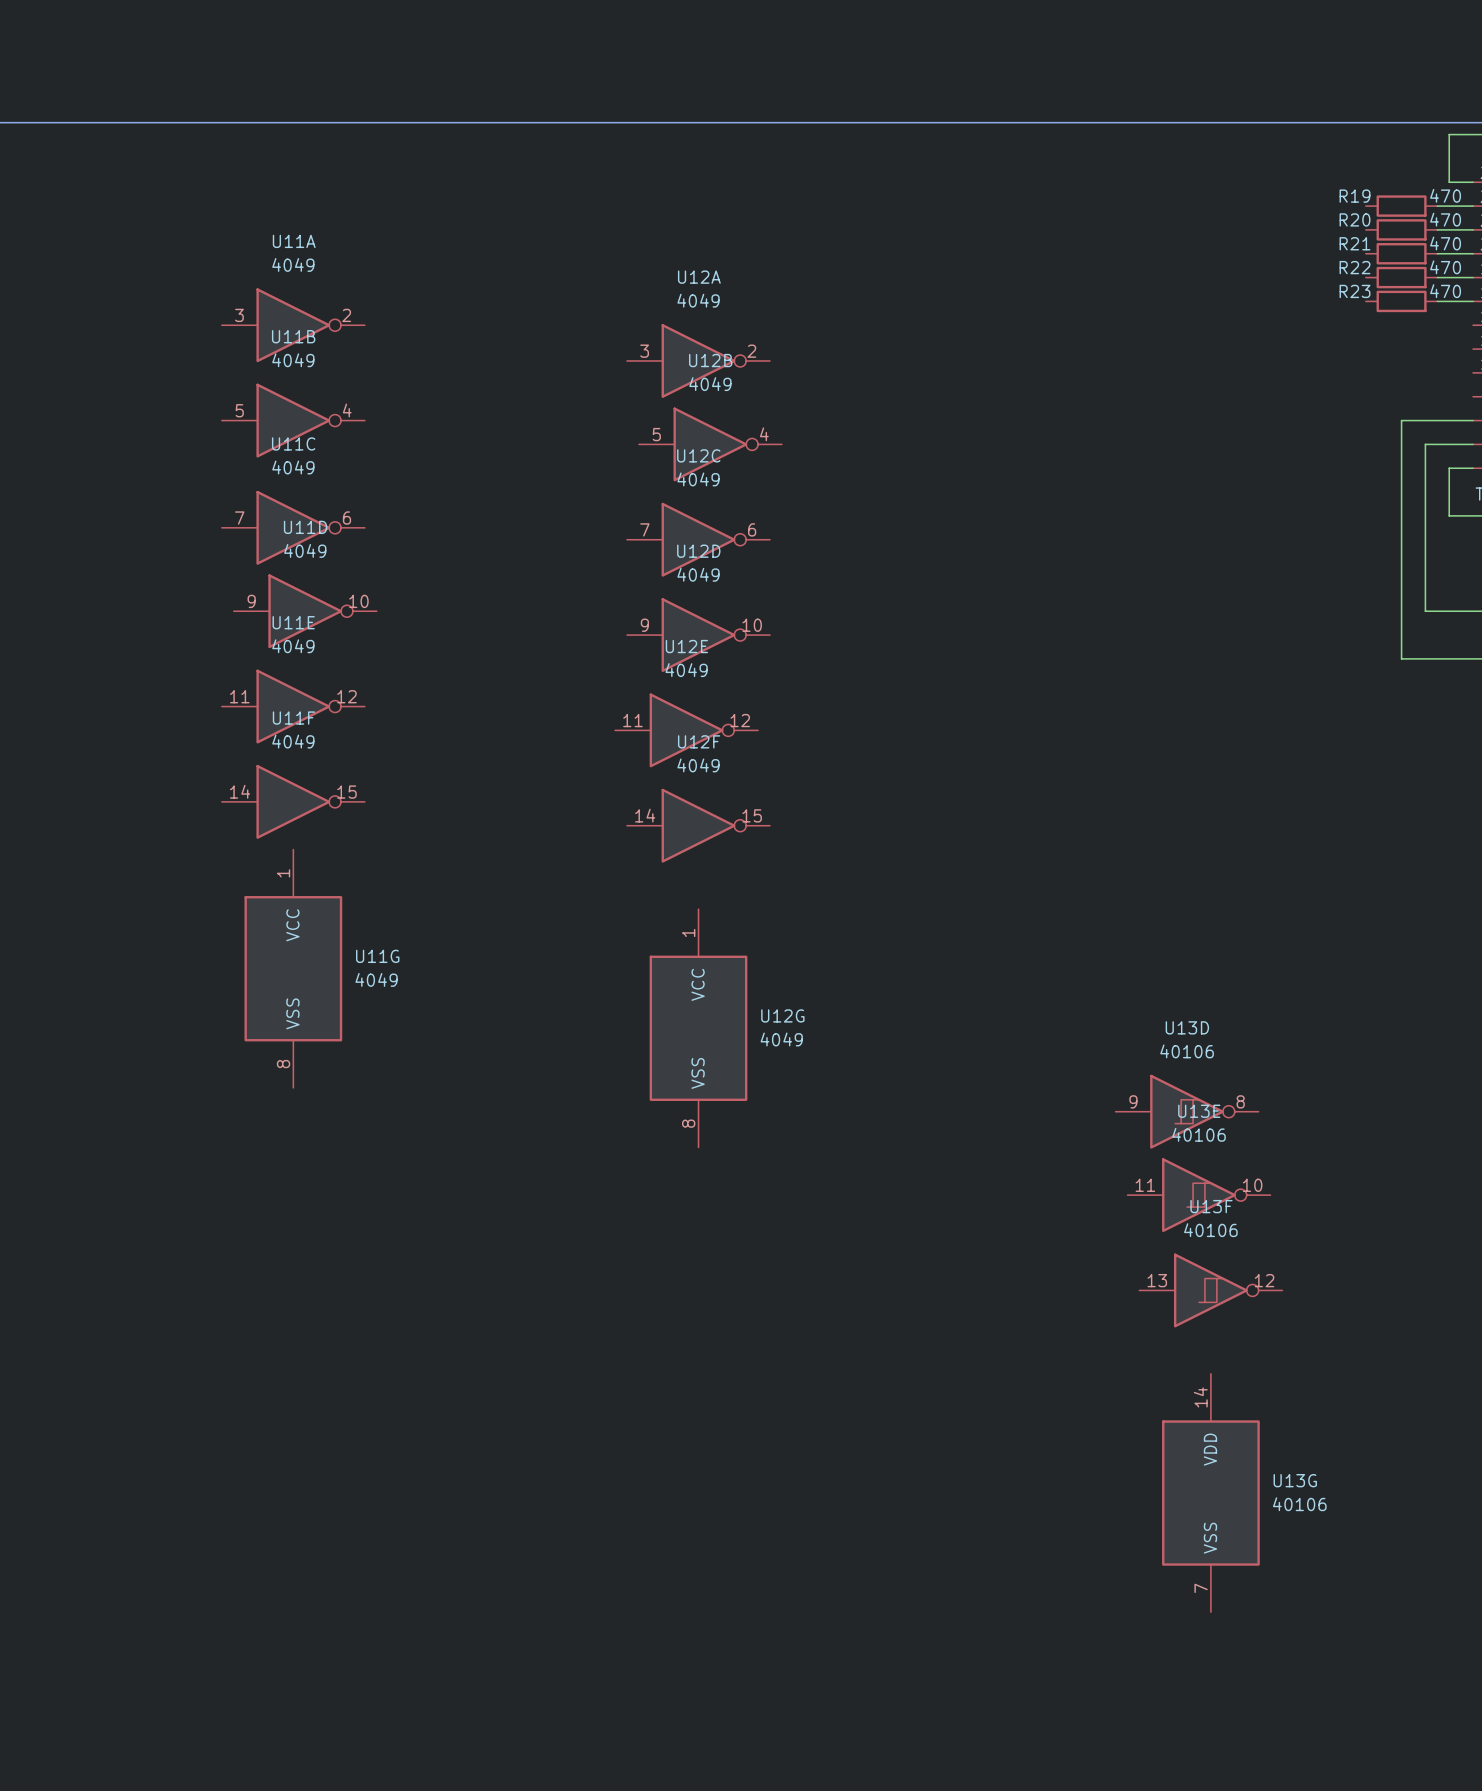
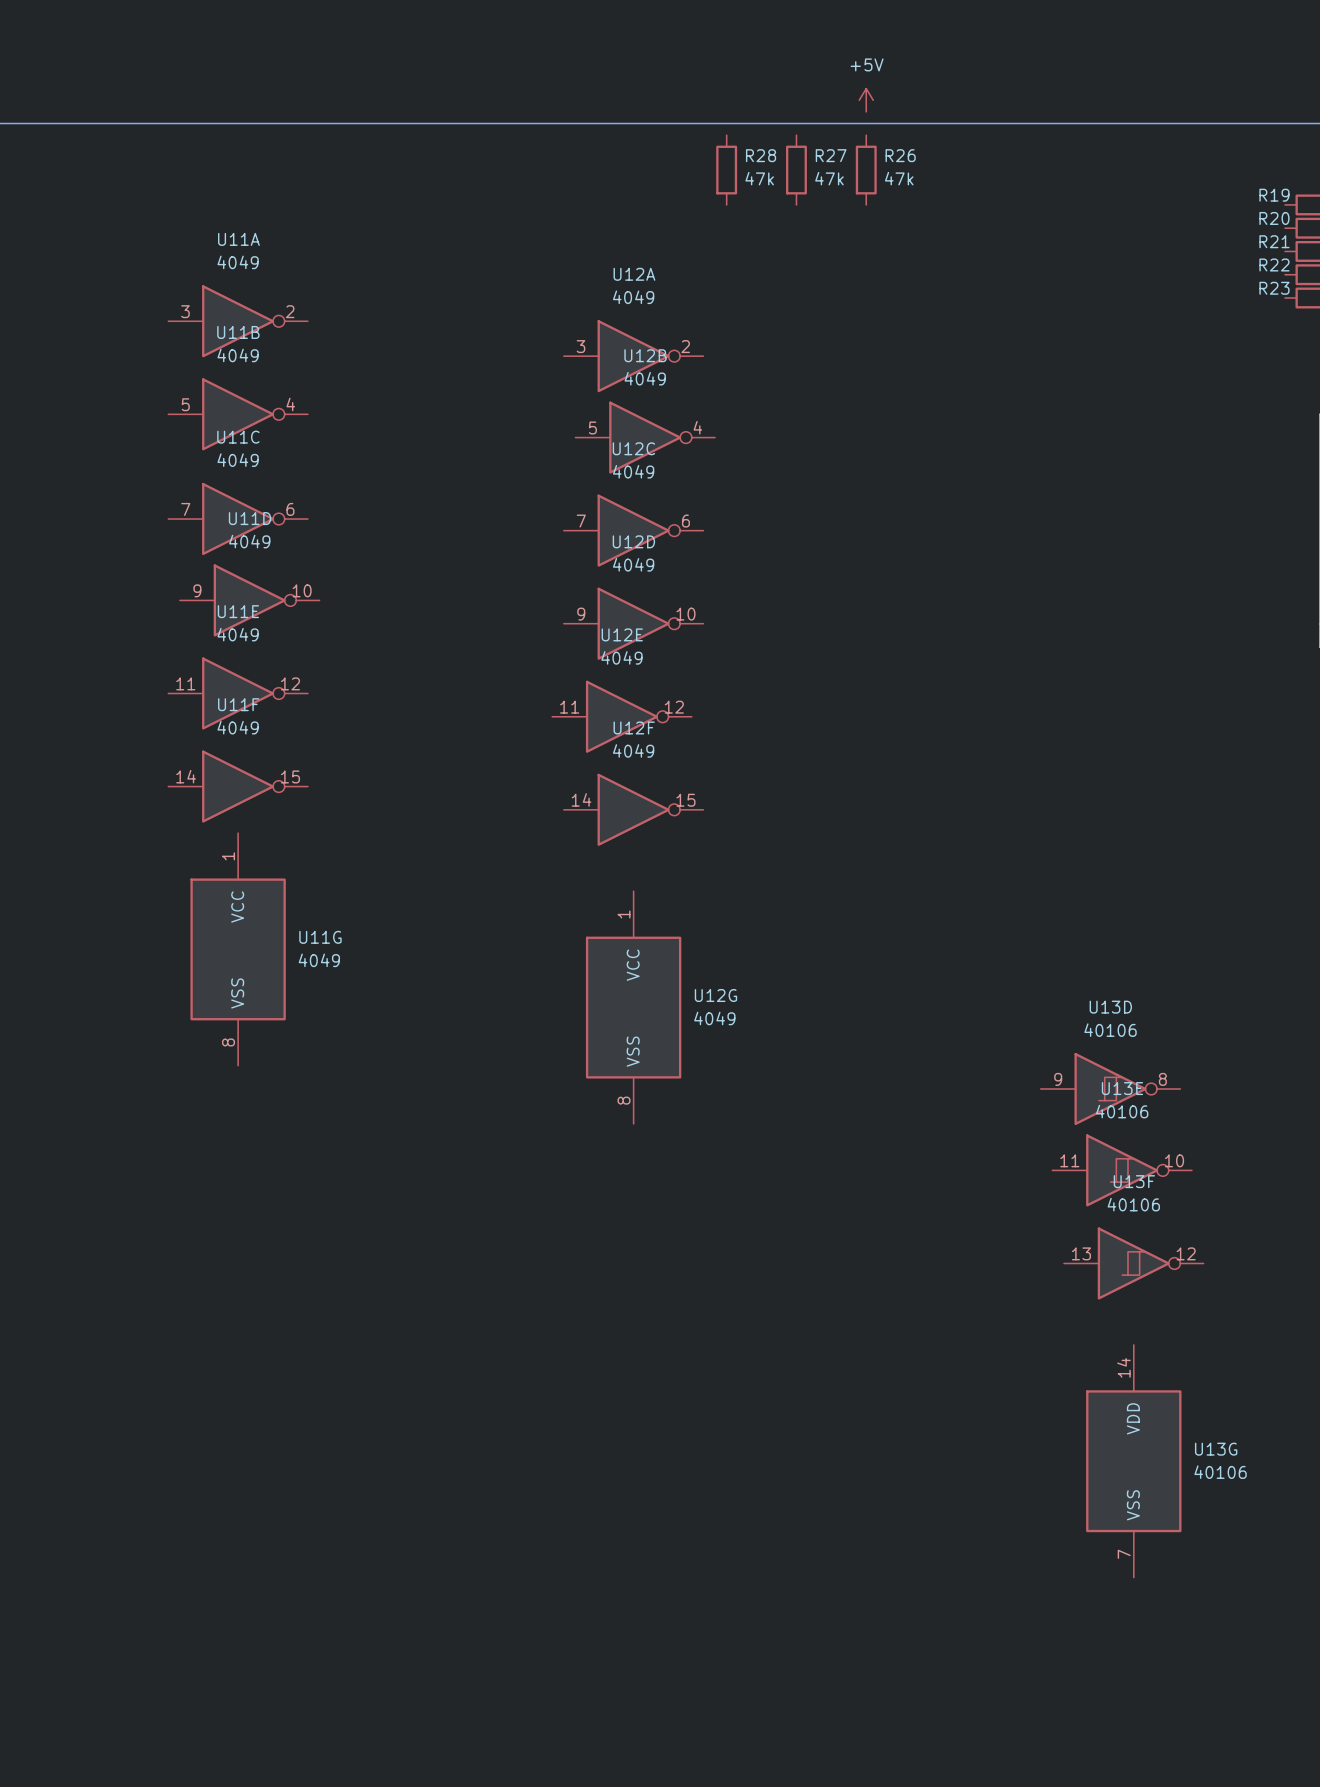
power symbol: none -> +5V (866, 100)
R28: none -> 47k (726, 170)
R27: none -> 47k (796, 170)
R26: none -> 47k (866, 170)

